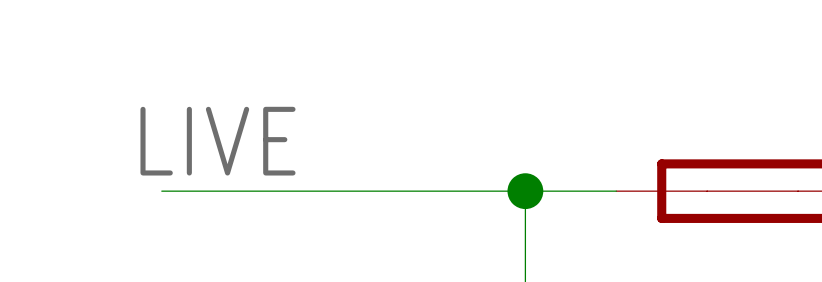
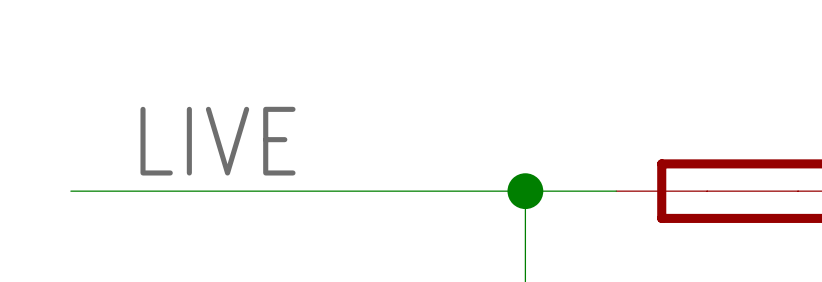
wire: none -> (70, 191) (161, 191)

